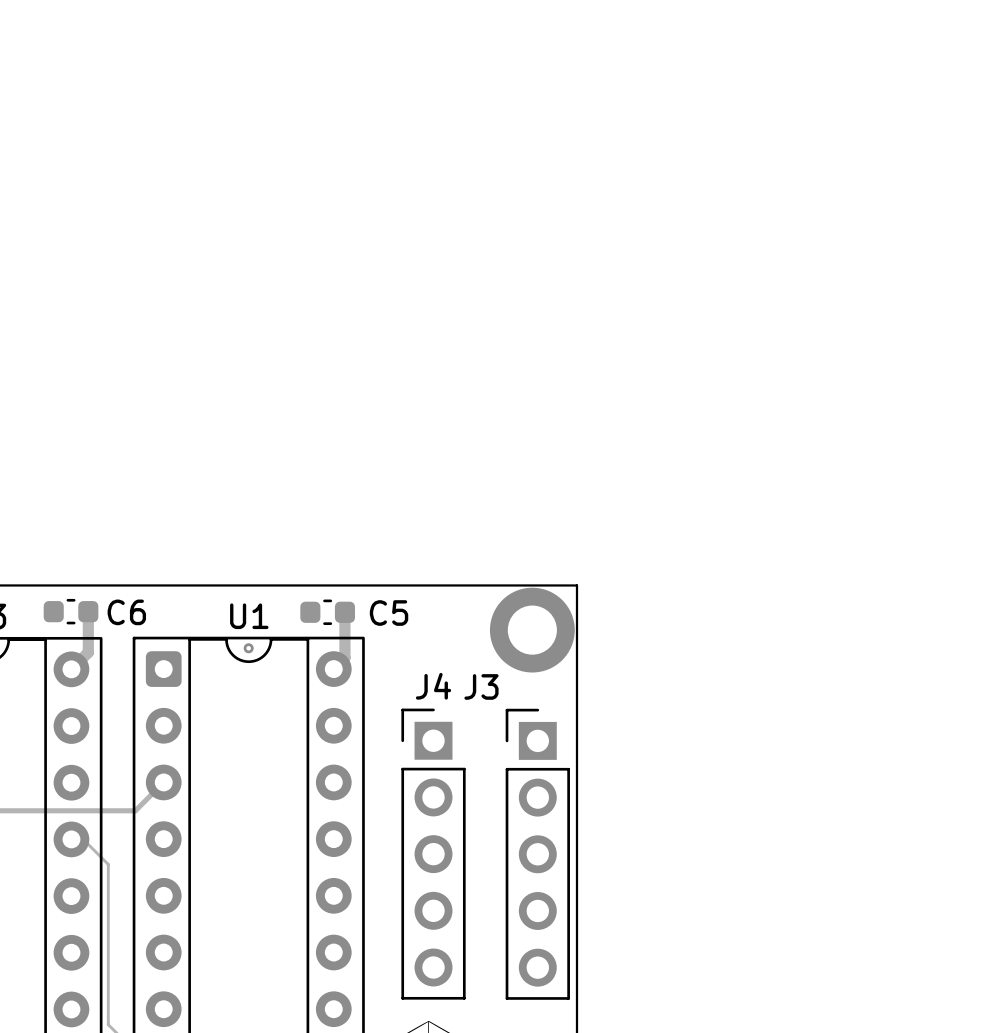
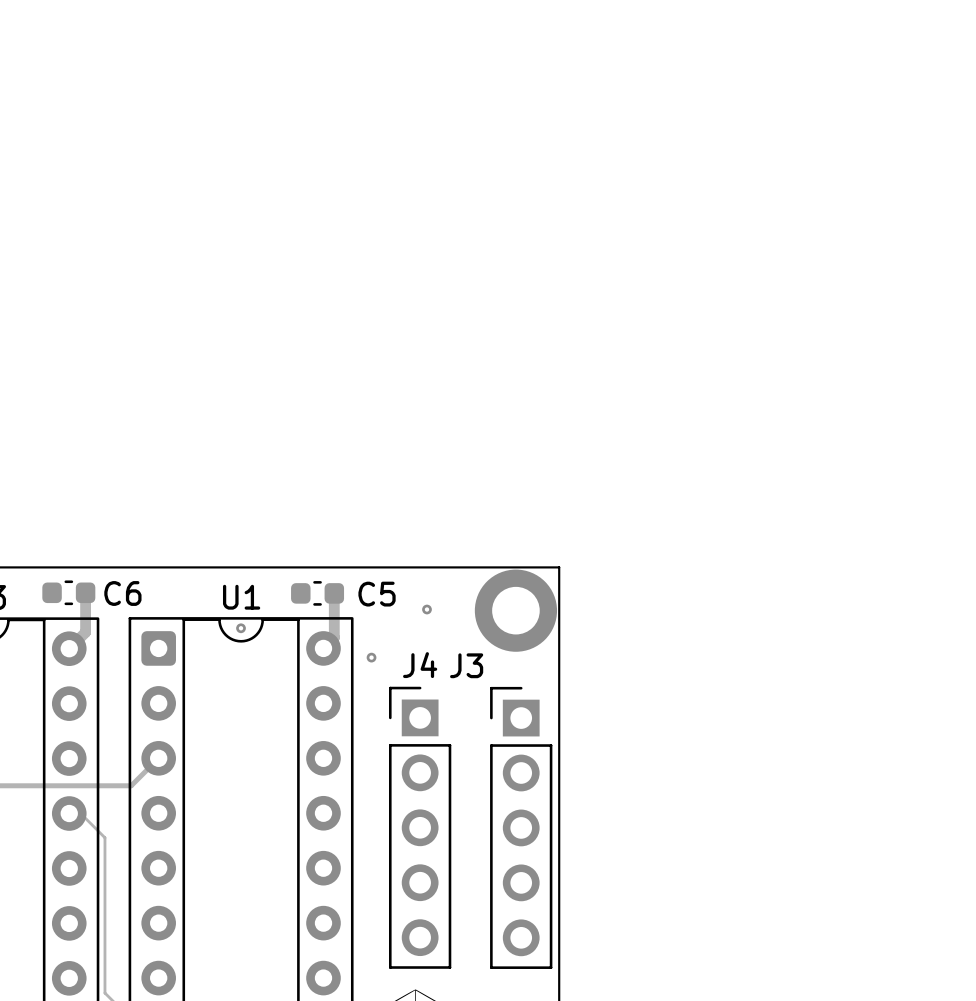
via: none -> (426, 609)
via: none -> (371, 657)

